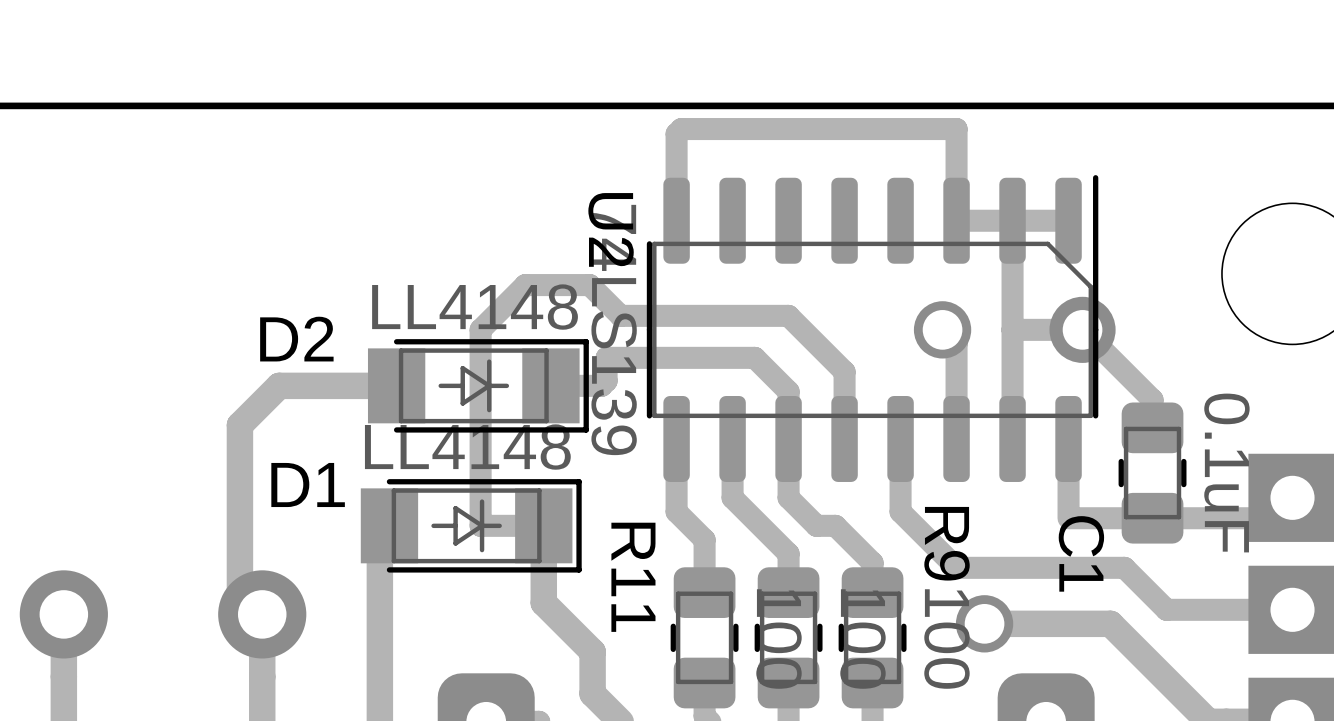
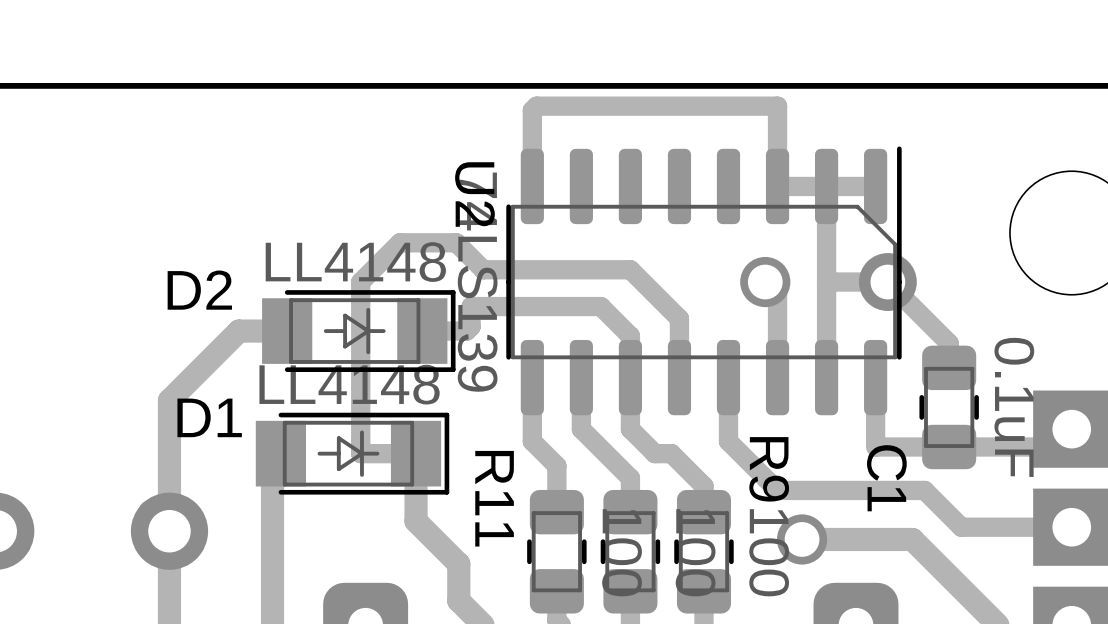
track: (341, 385) (279, 385) (239, 425) -> (238, 331) (169, 400) (169, 531)
track: (239, 425) (239, 592) -> none

